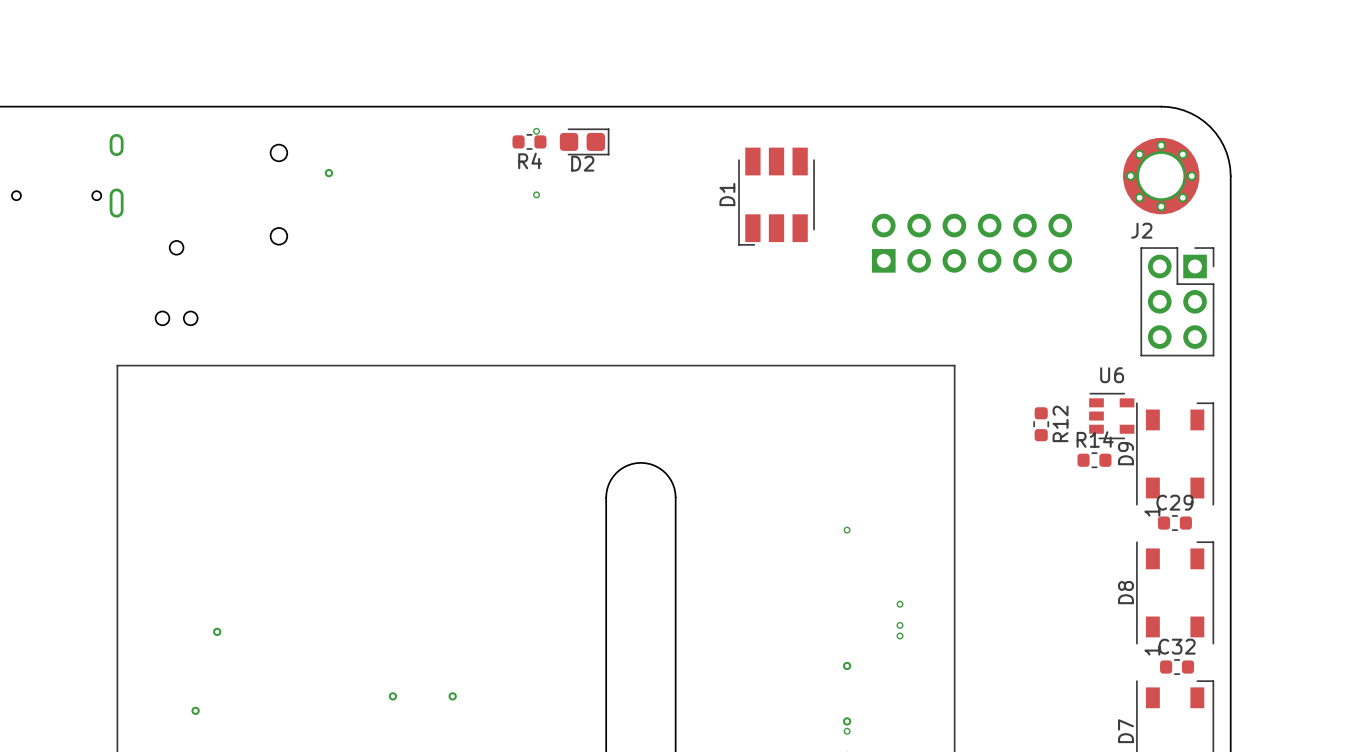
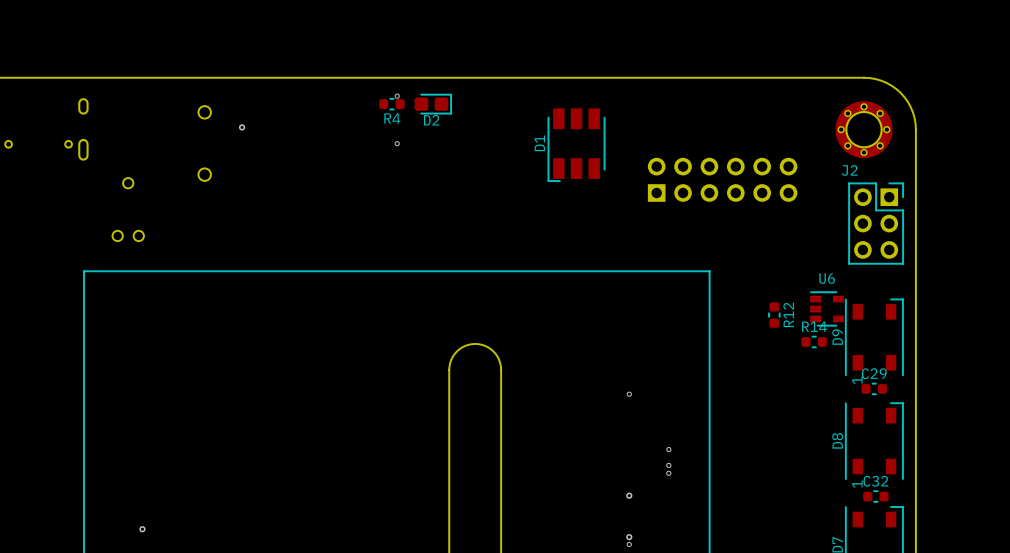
via: (217, 631) -> none
via: (392, 696) -> none
via: (452, 696) -> none

